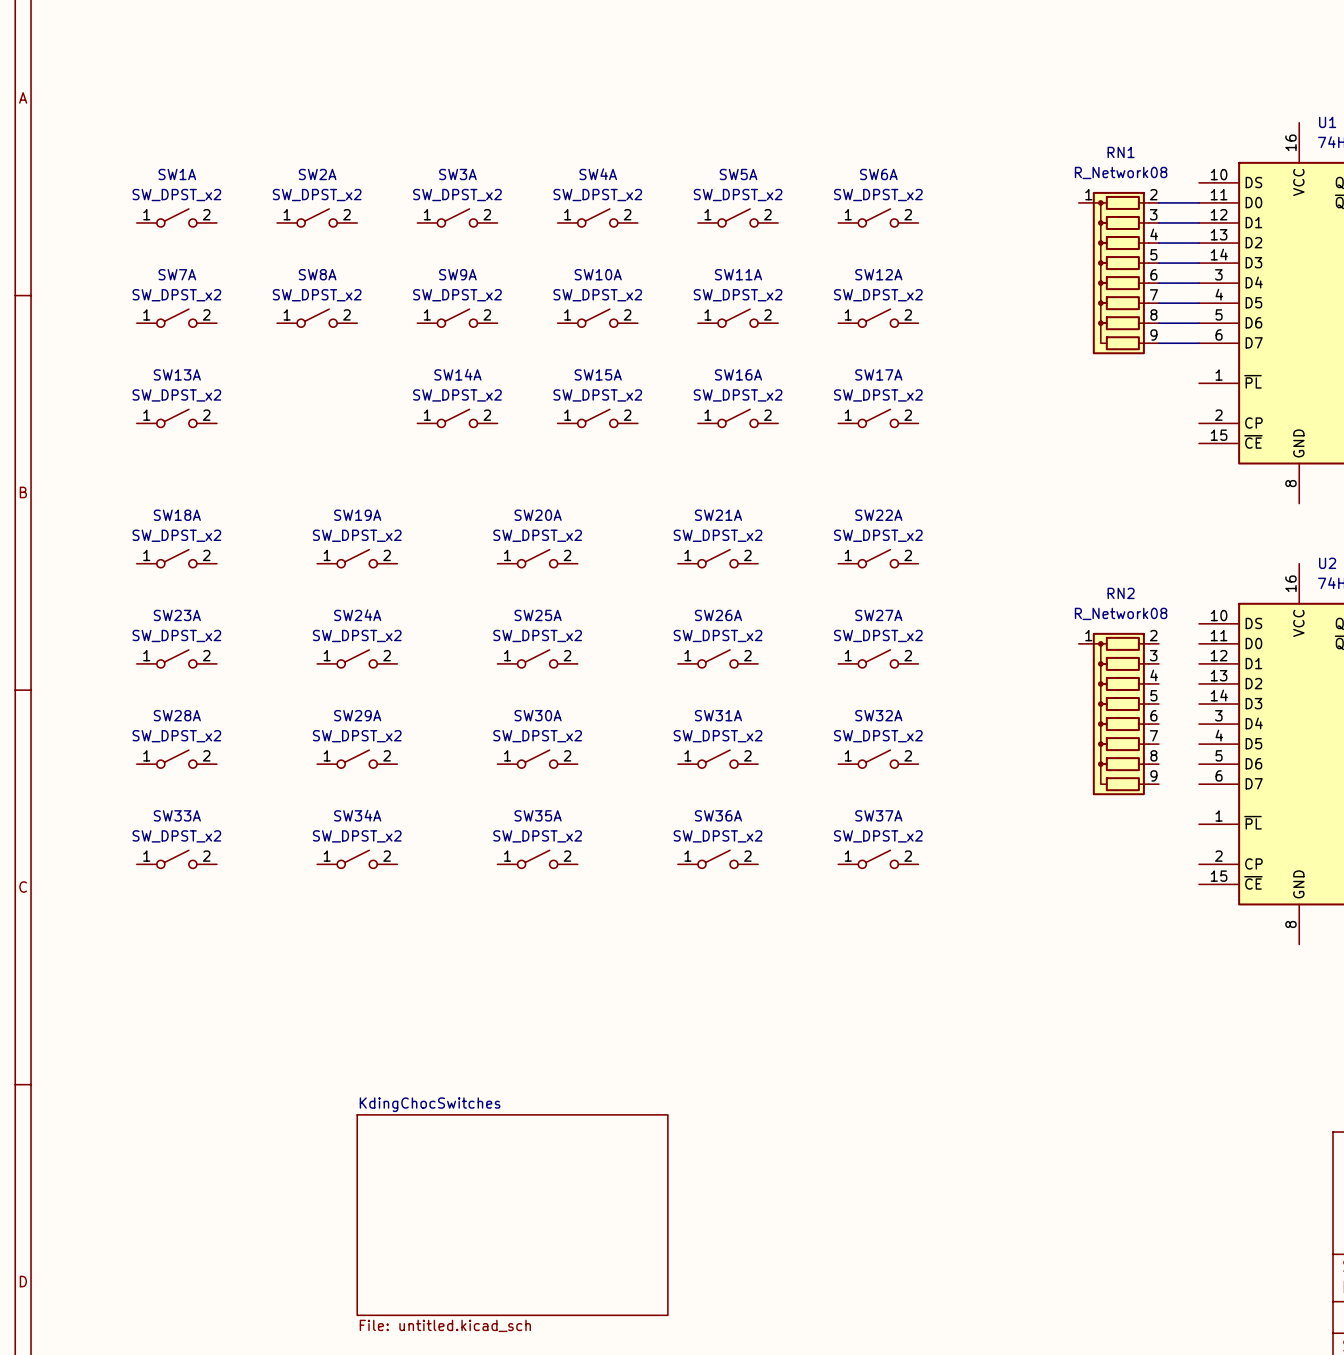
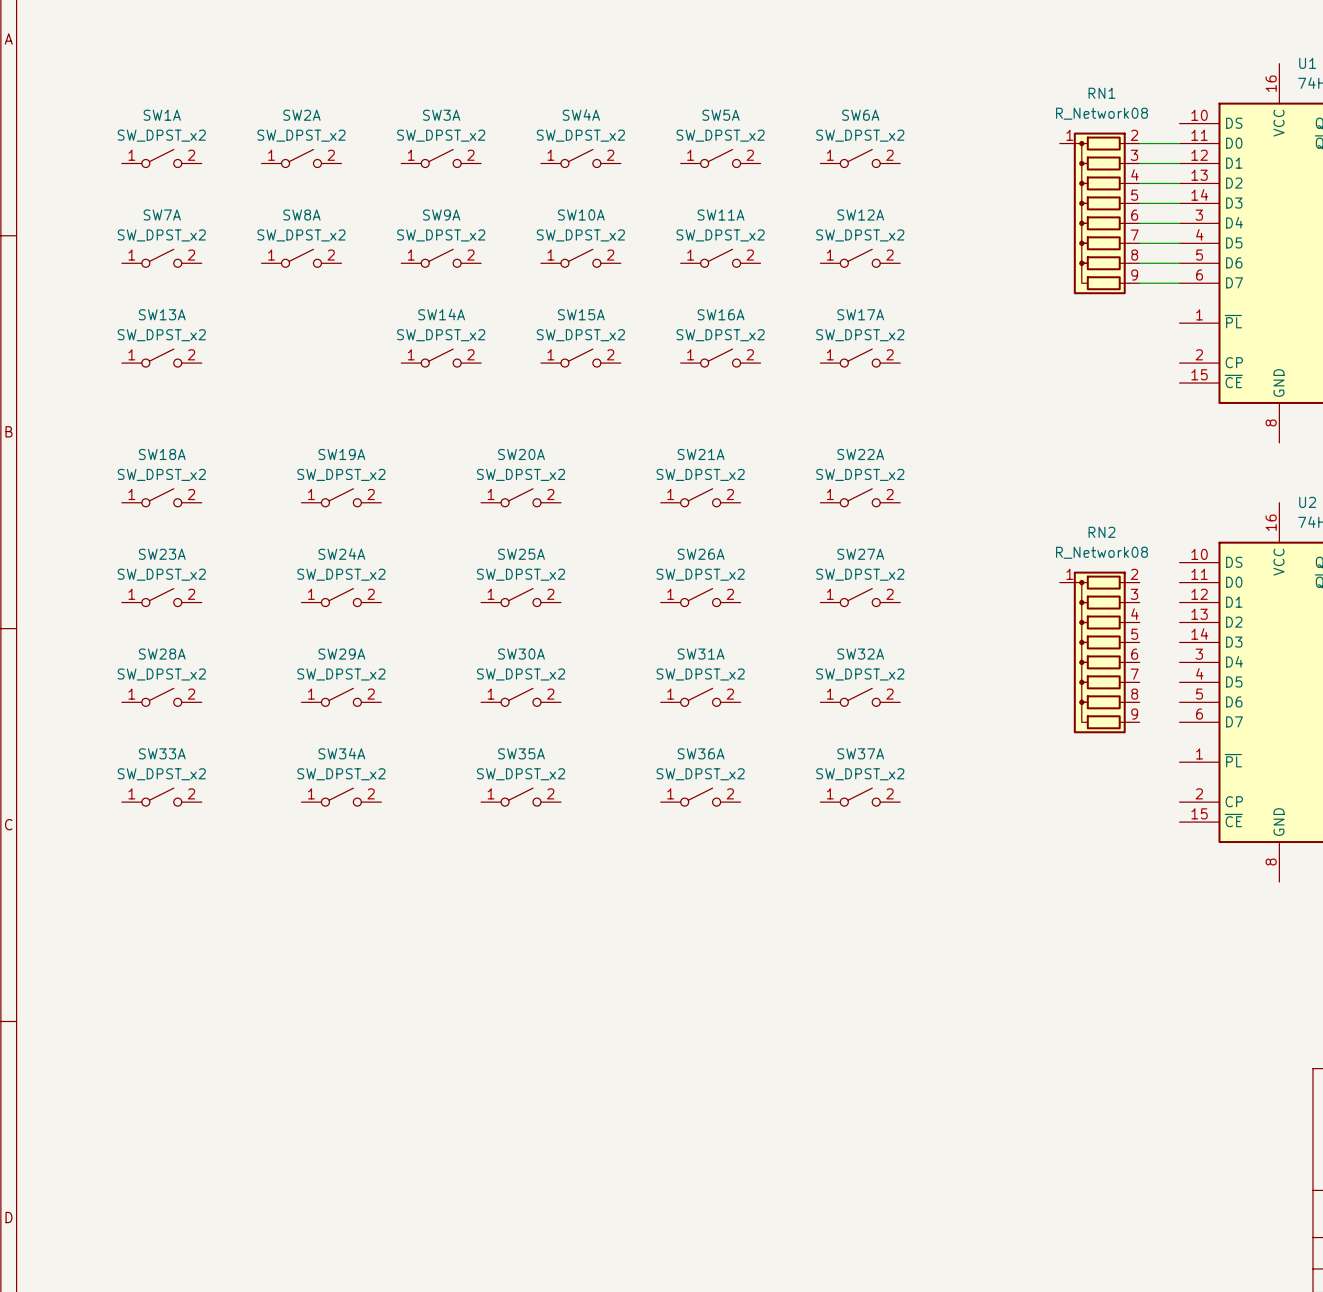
sheet KdingChocSwitches: File: untitled.kicad_sch (512, 1215) -> none

